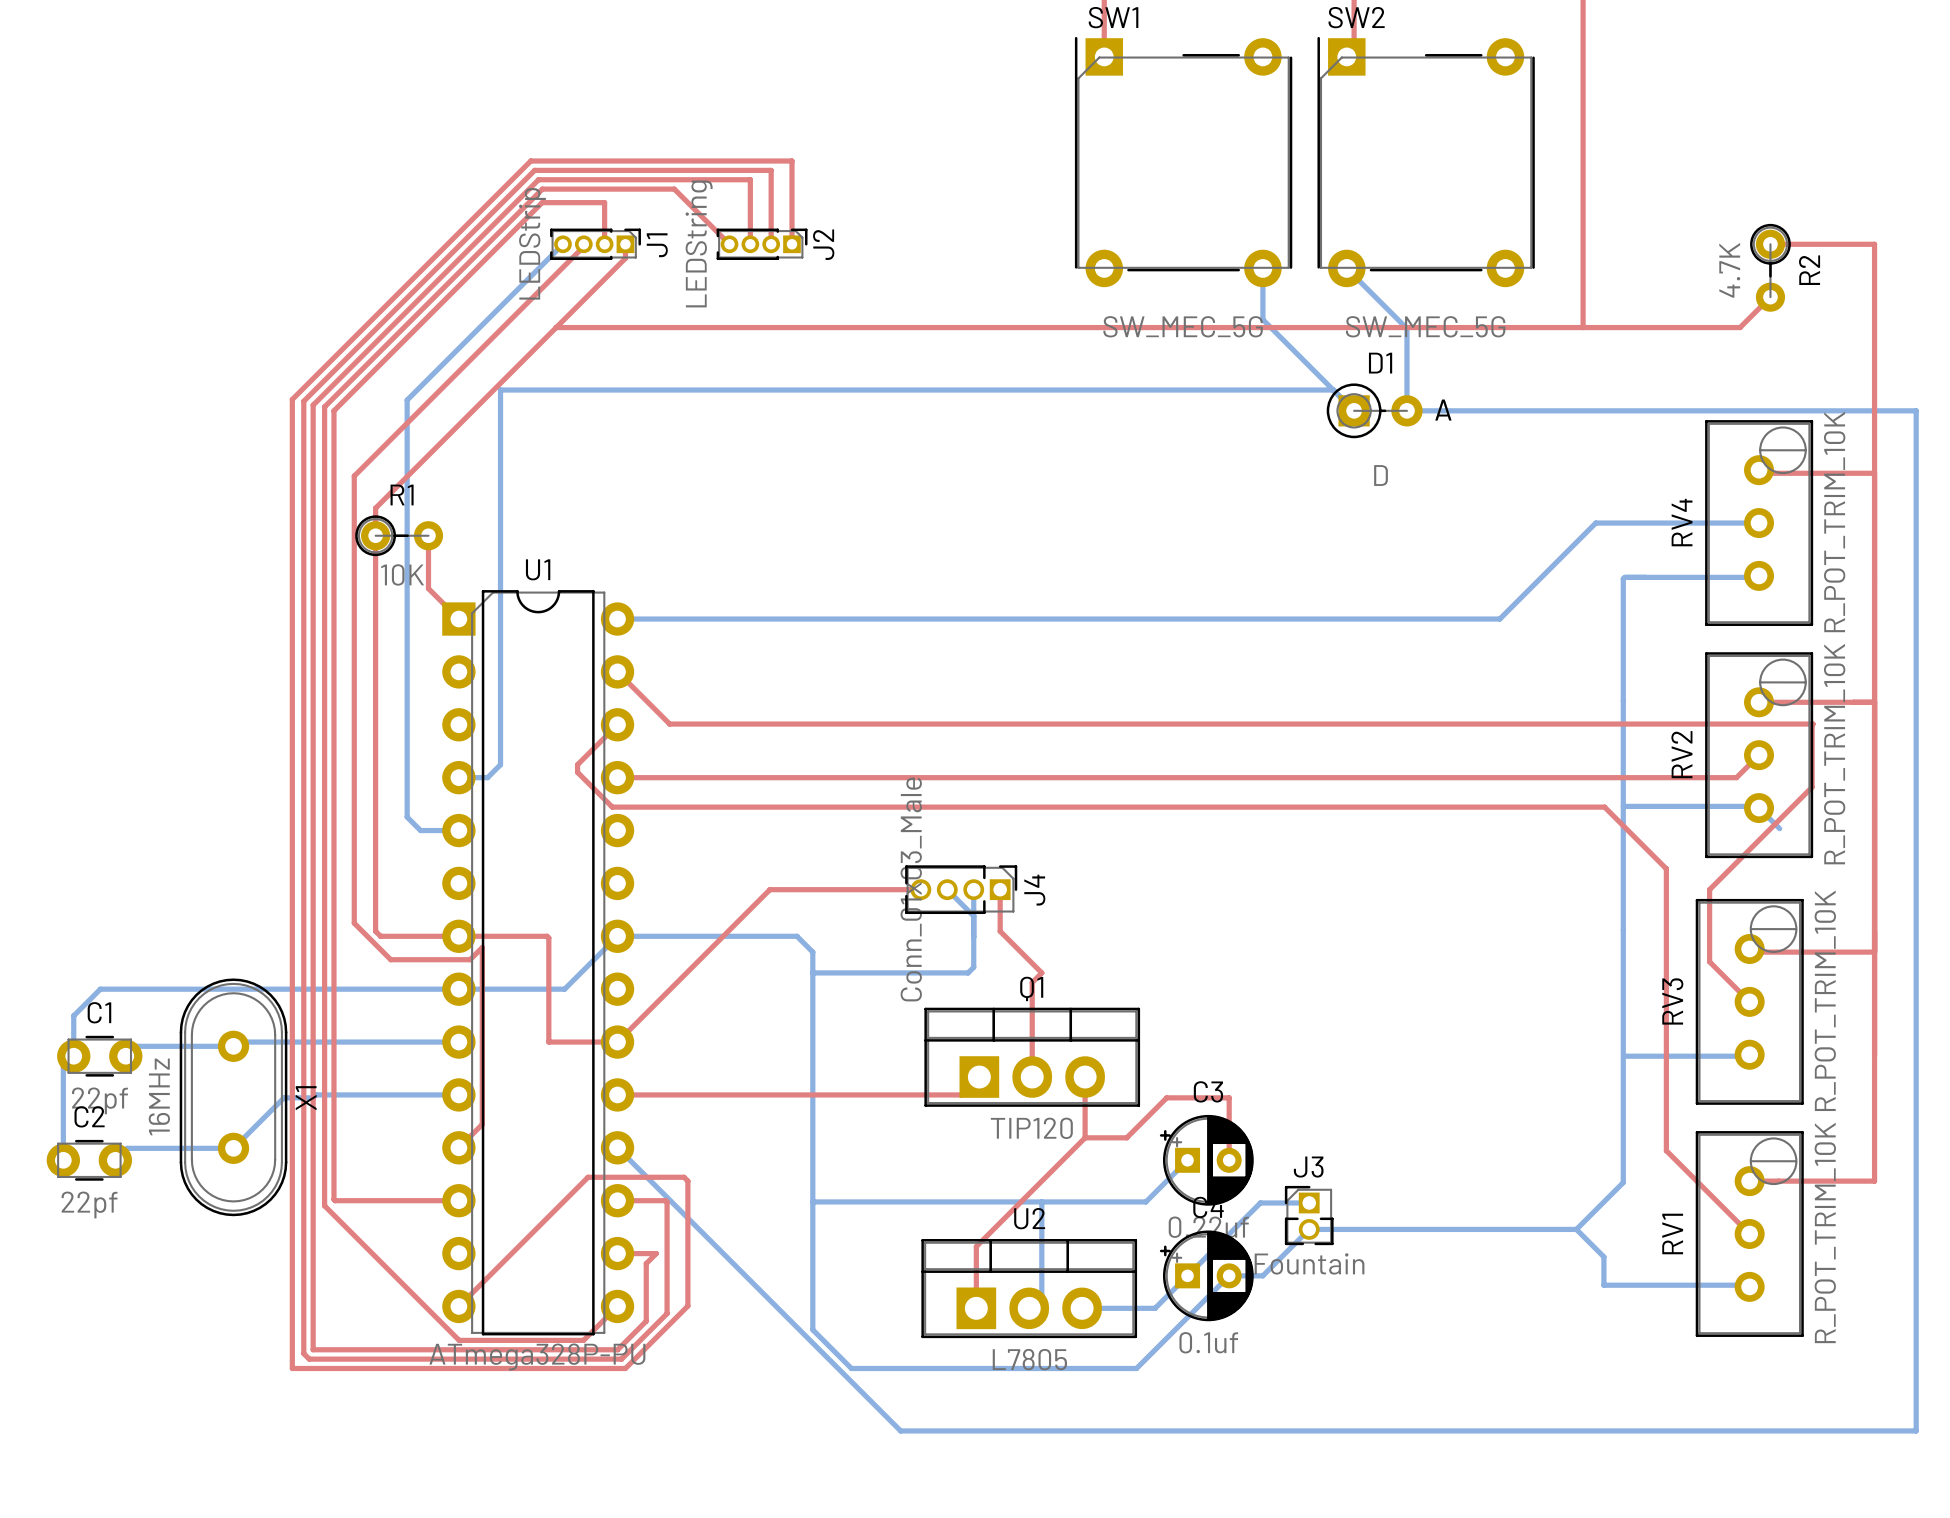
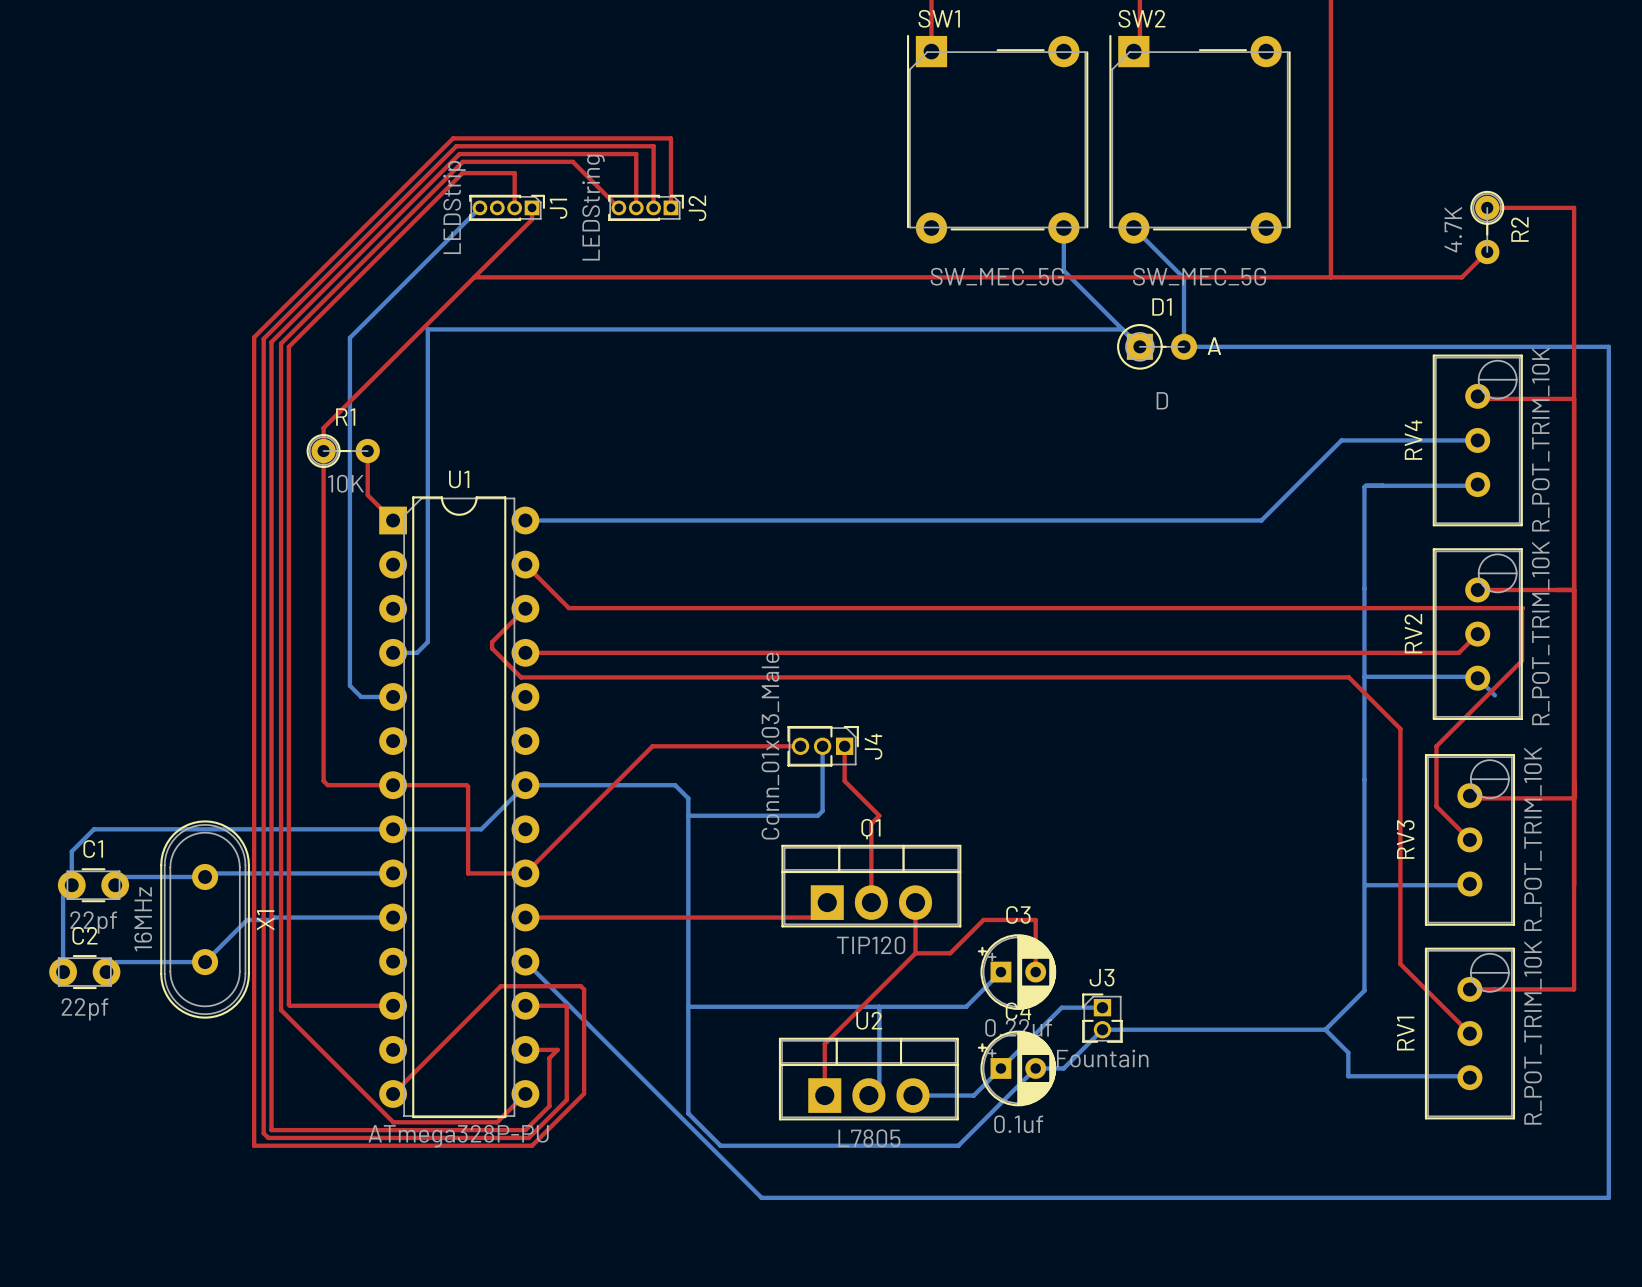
top track: (583, 244) (583, 246) (354, 476) (354, 923) (390, 959) (470, 959) (482, 947) (482, 1124) (458, 1147) -> none
J4 footprint: [905, 865, 1018, 915] -> [787, 725, 859, 767]
top track: none -> (778, 746) (800, 746)
bottom track: (947, 889) (973, 916) -> none

